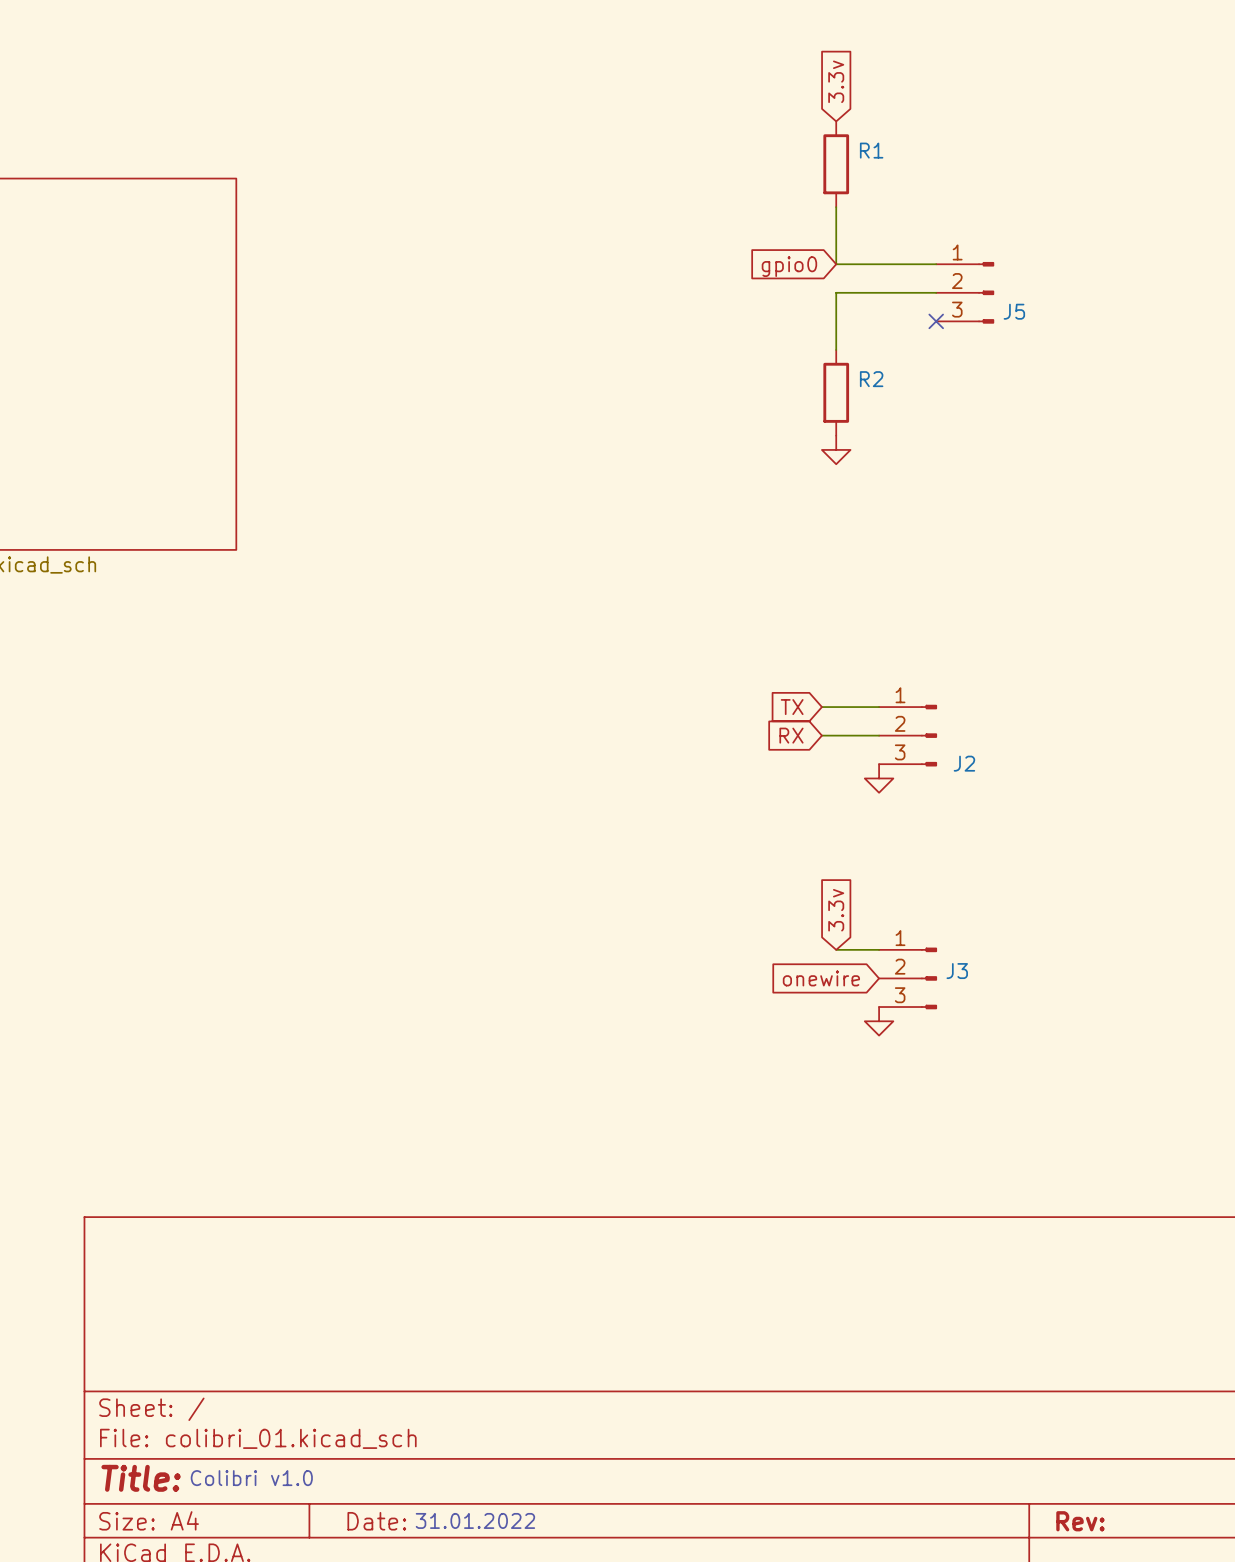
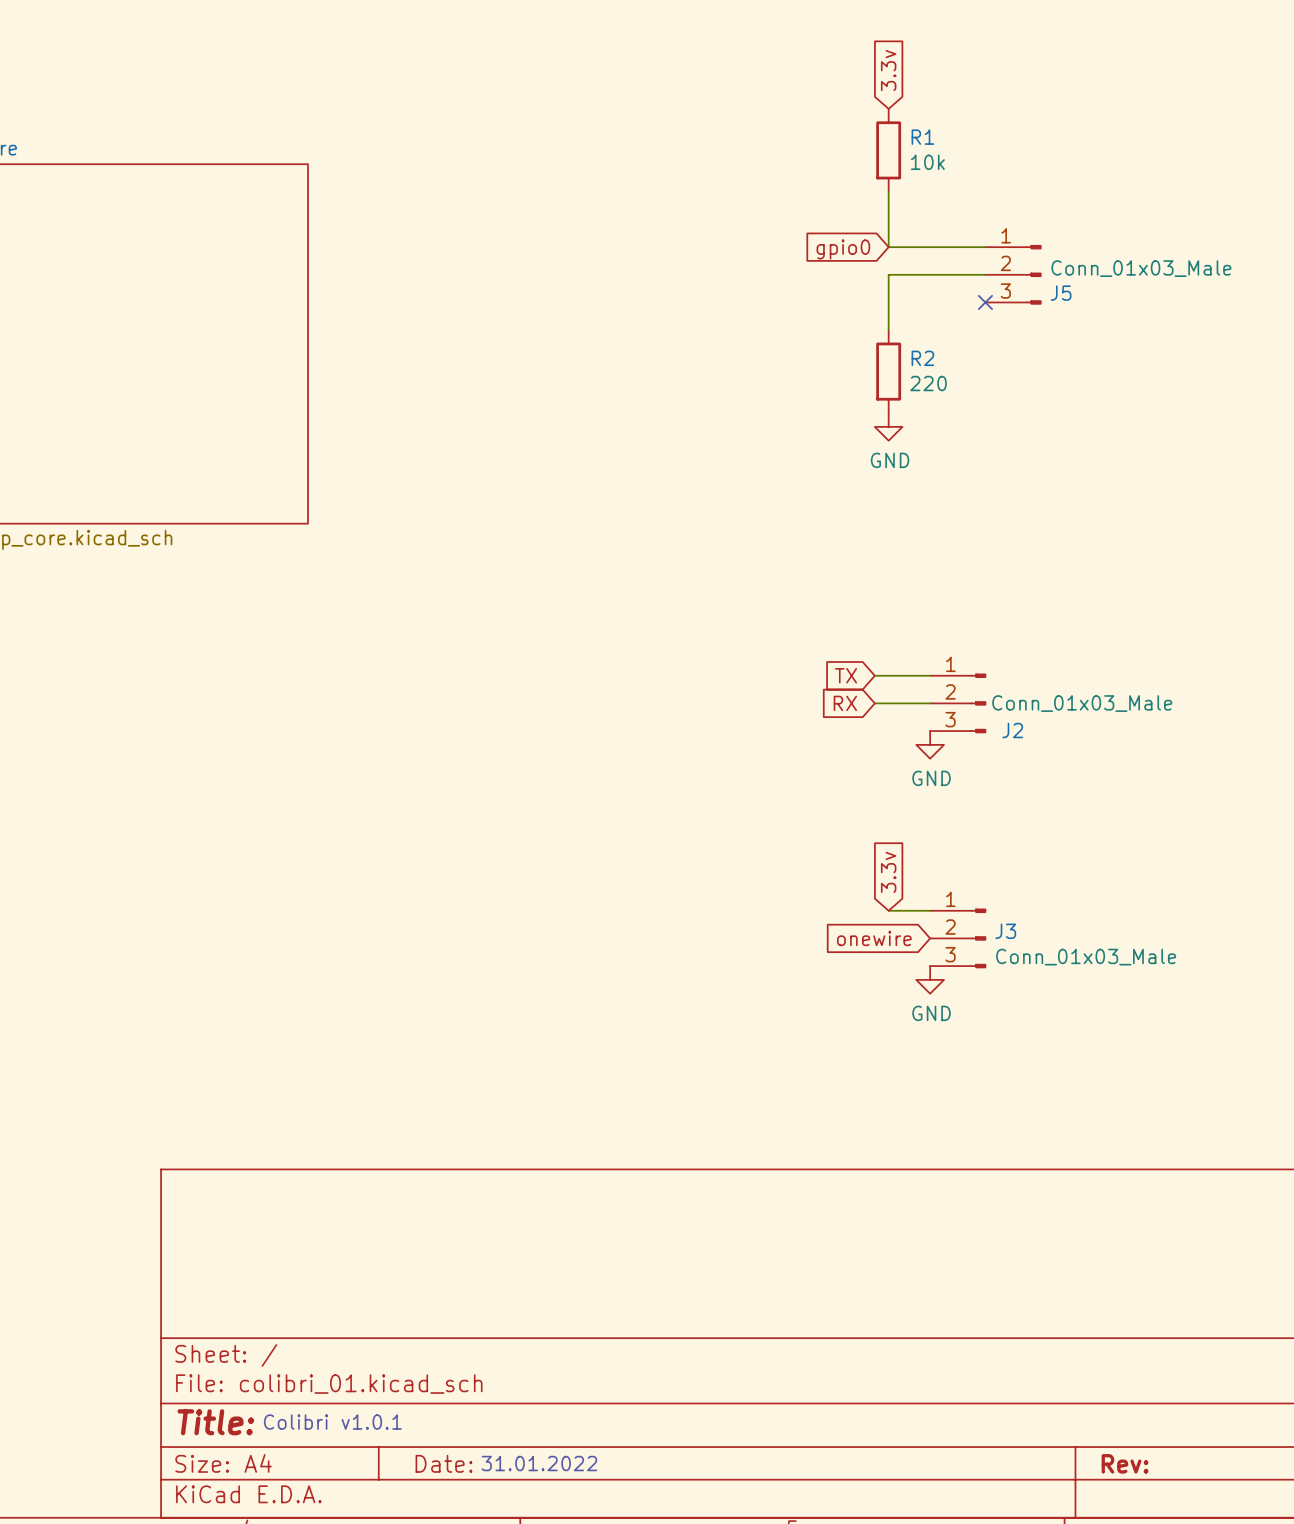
R1 value: none -> 10k (927, 162)
J5 value: none -> Conn_01x03_Male (1141, 268)
R2 value: none -> 220 (928, 383)
power symbol text: none -> GND (890, 460)
J2 value: none -> Conn_01x03_Male (1082, 703)
power symbol text: none -> GND (931, 778)
J3 value: none -> Conn_01x03_Male (1086, 957)
power symbol text: none -> GND (931, 1013)
text: Colibri v1.0 (251, 1478) -> Colibri v1.0.1 (332, 1422)

